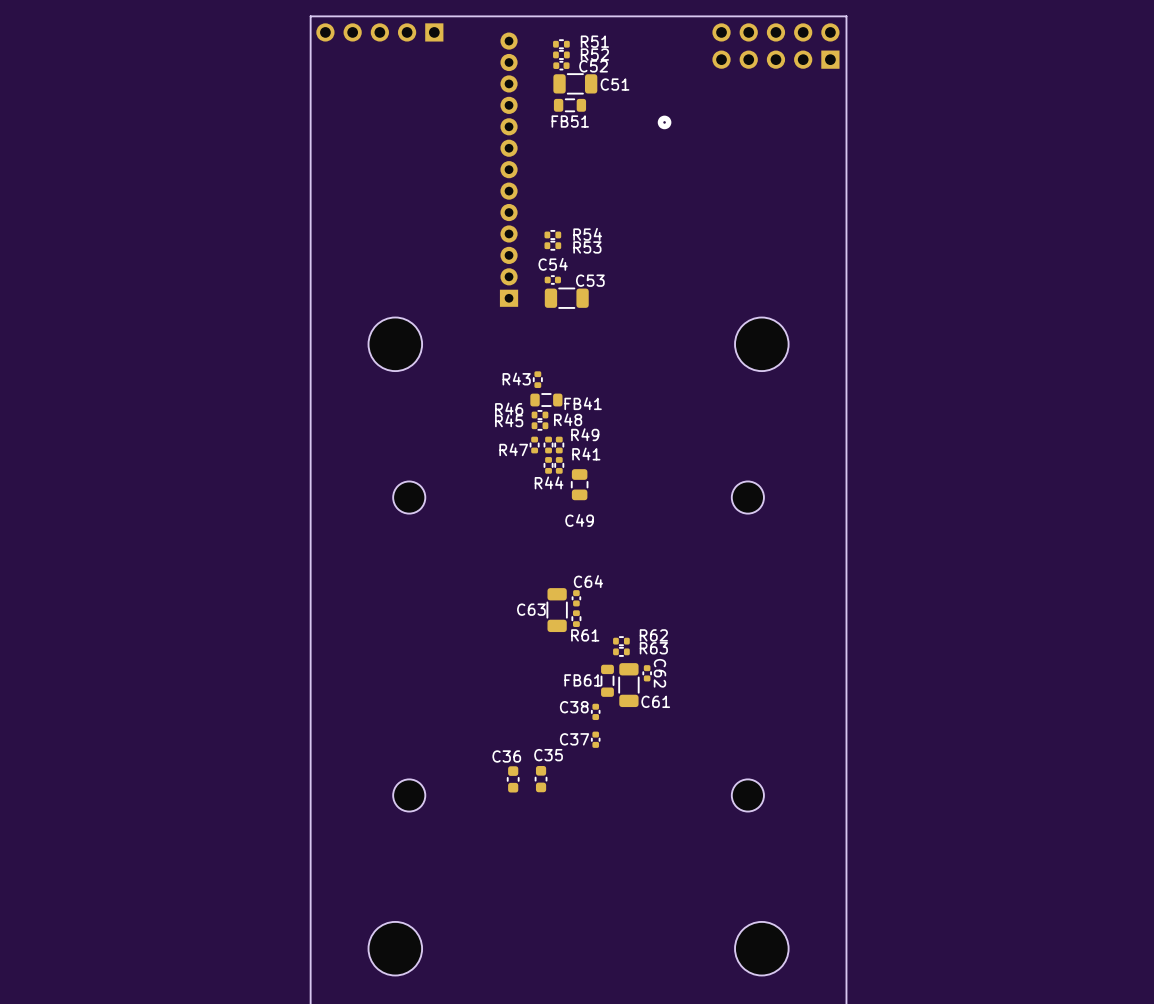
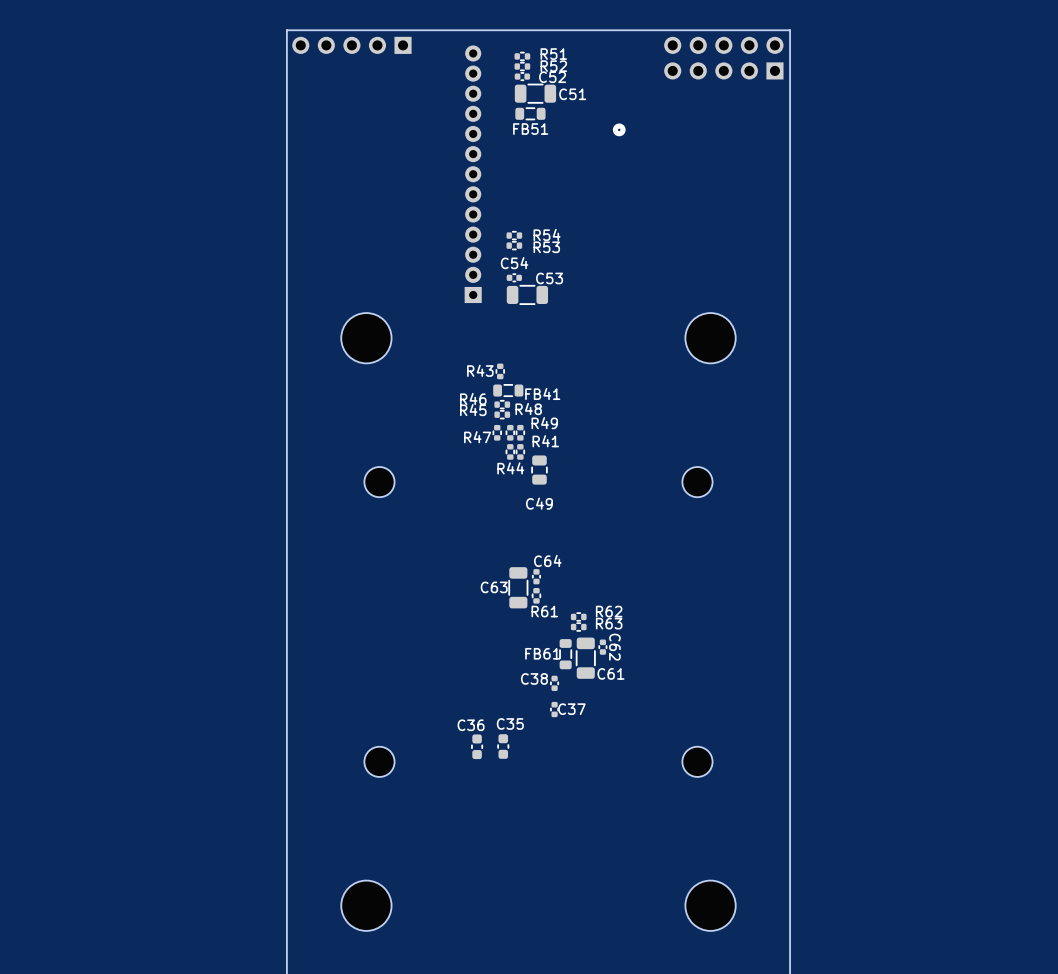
C37 name position: C37 (574, 739) -> C37 (571, 709)

